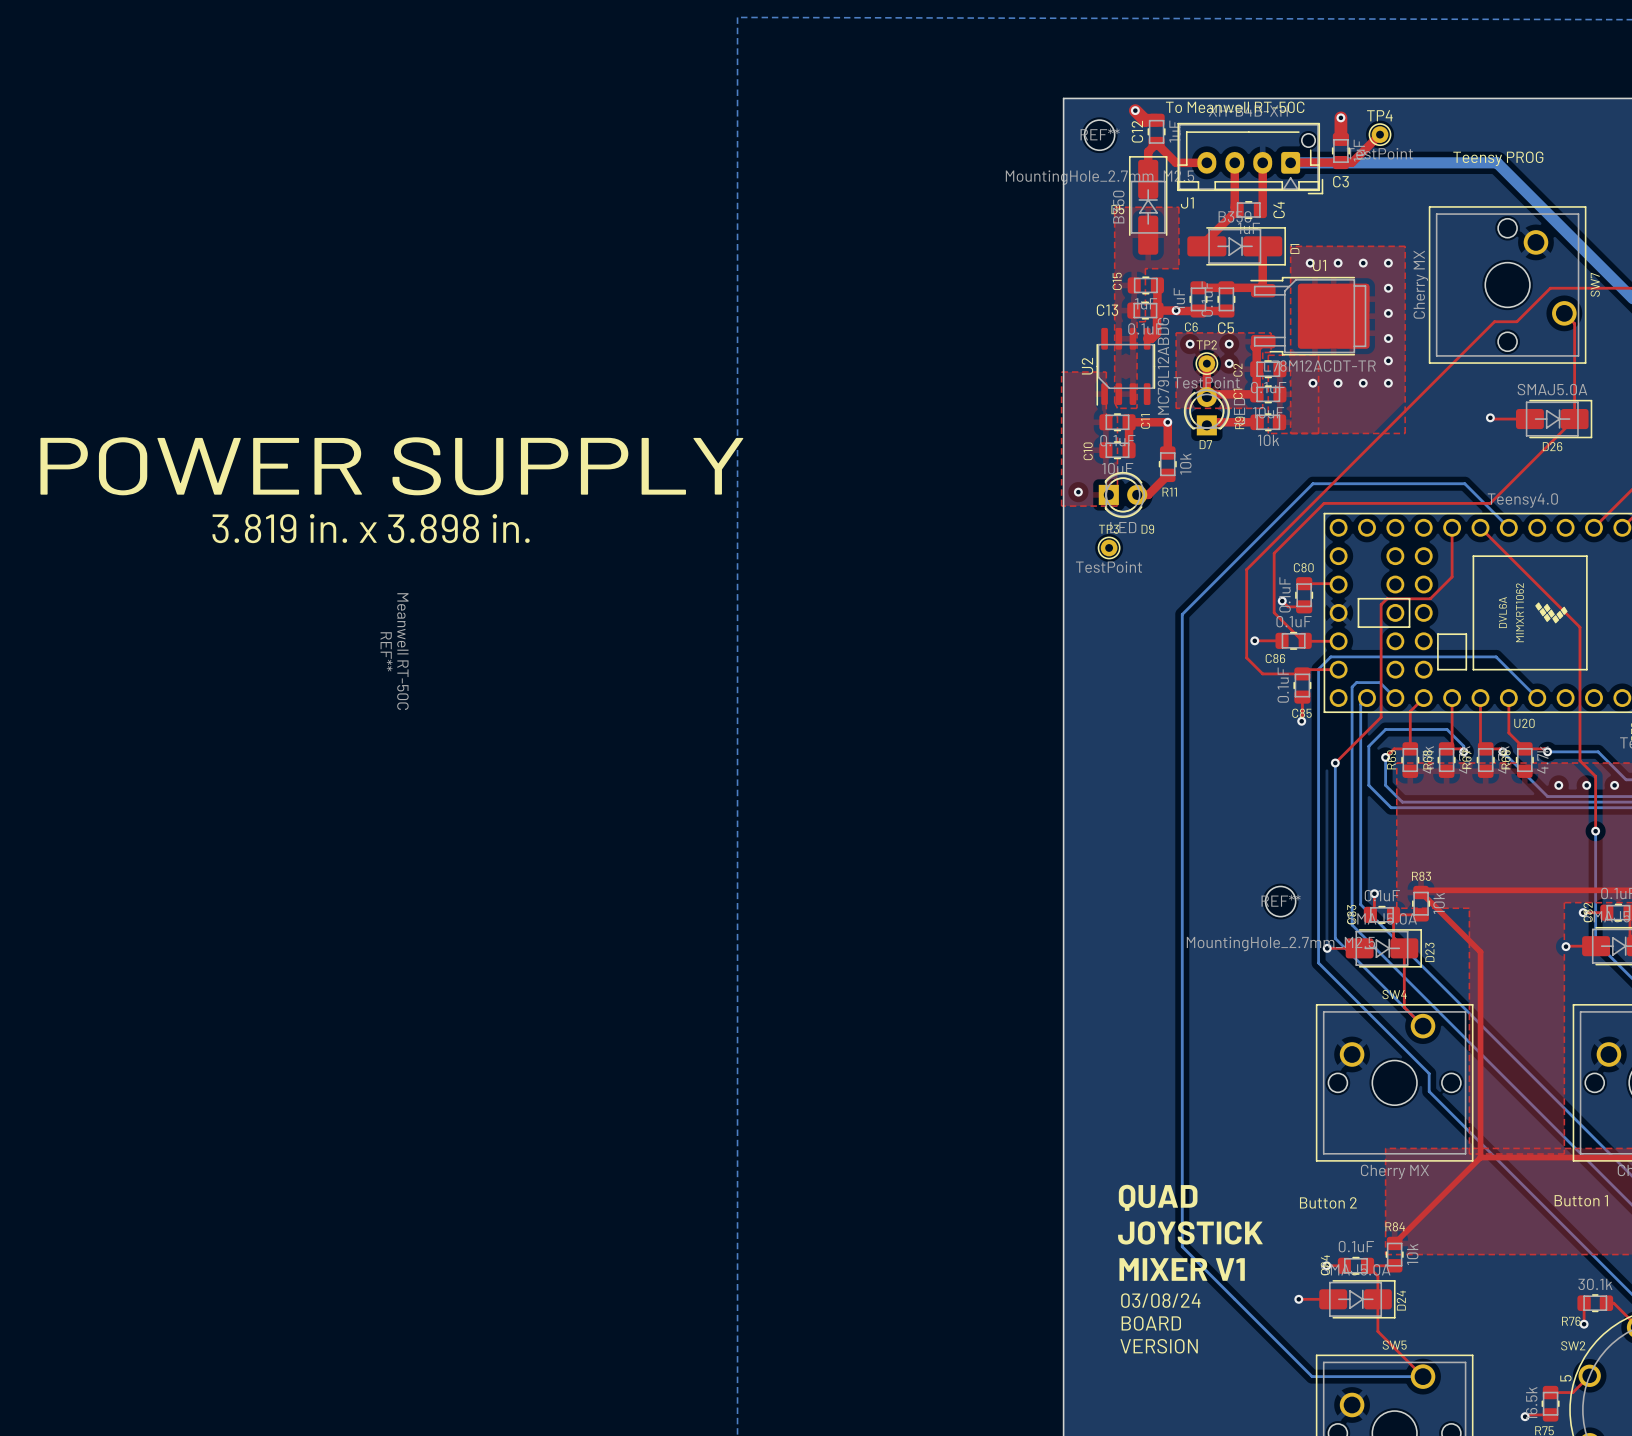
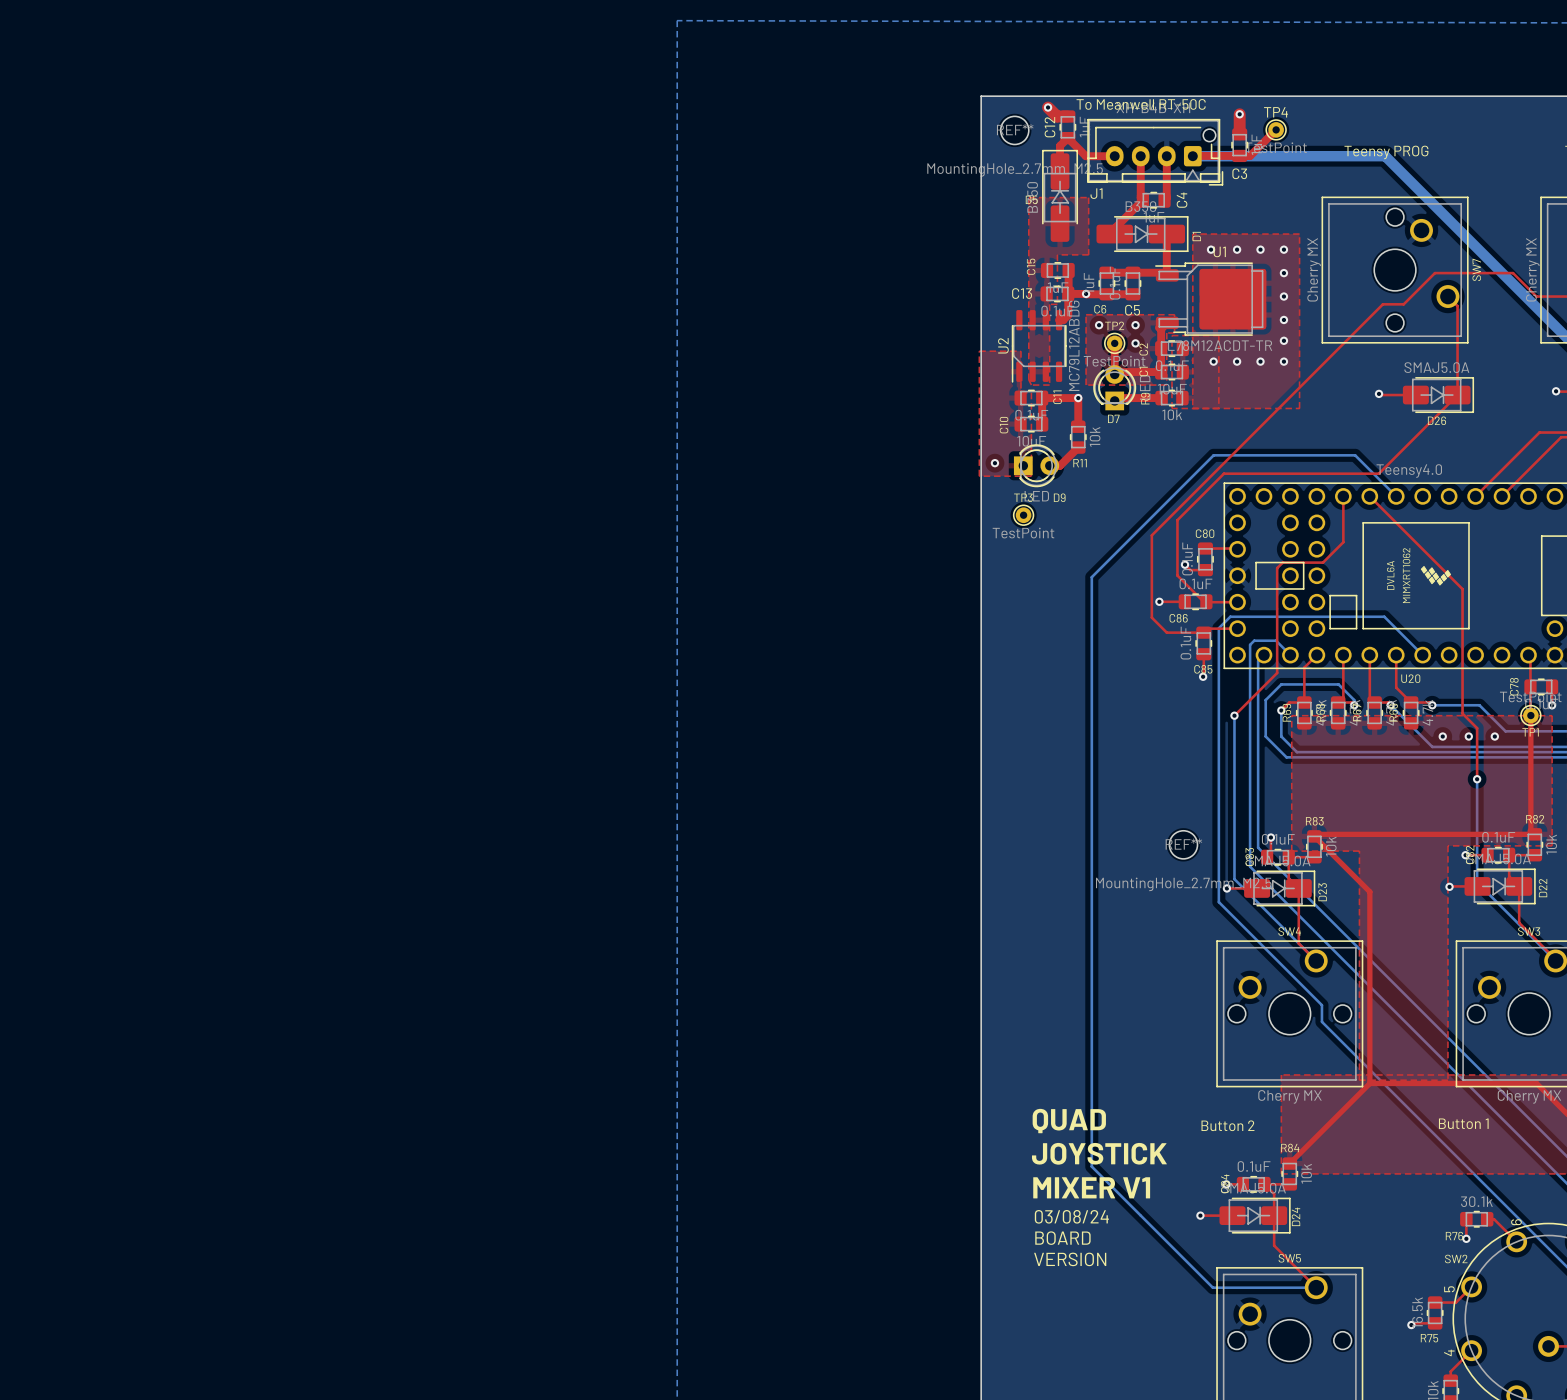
text: POWER SUPPLY (391, 466) -> none
text: 3.819 in. x 3.898 in. (371, 528) -> none
REF**: Meanwell RT-50C (394, 651) -> none

